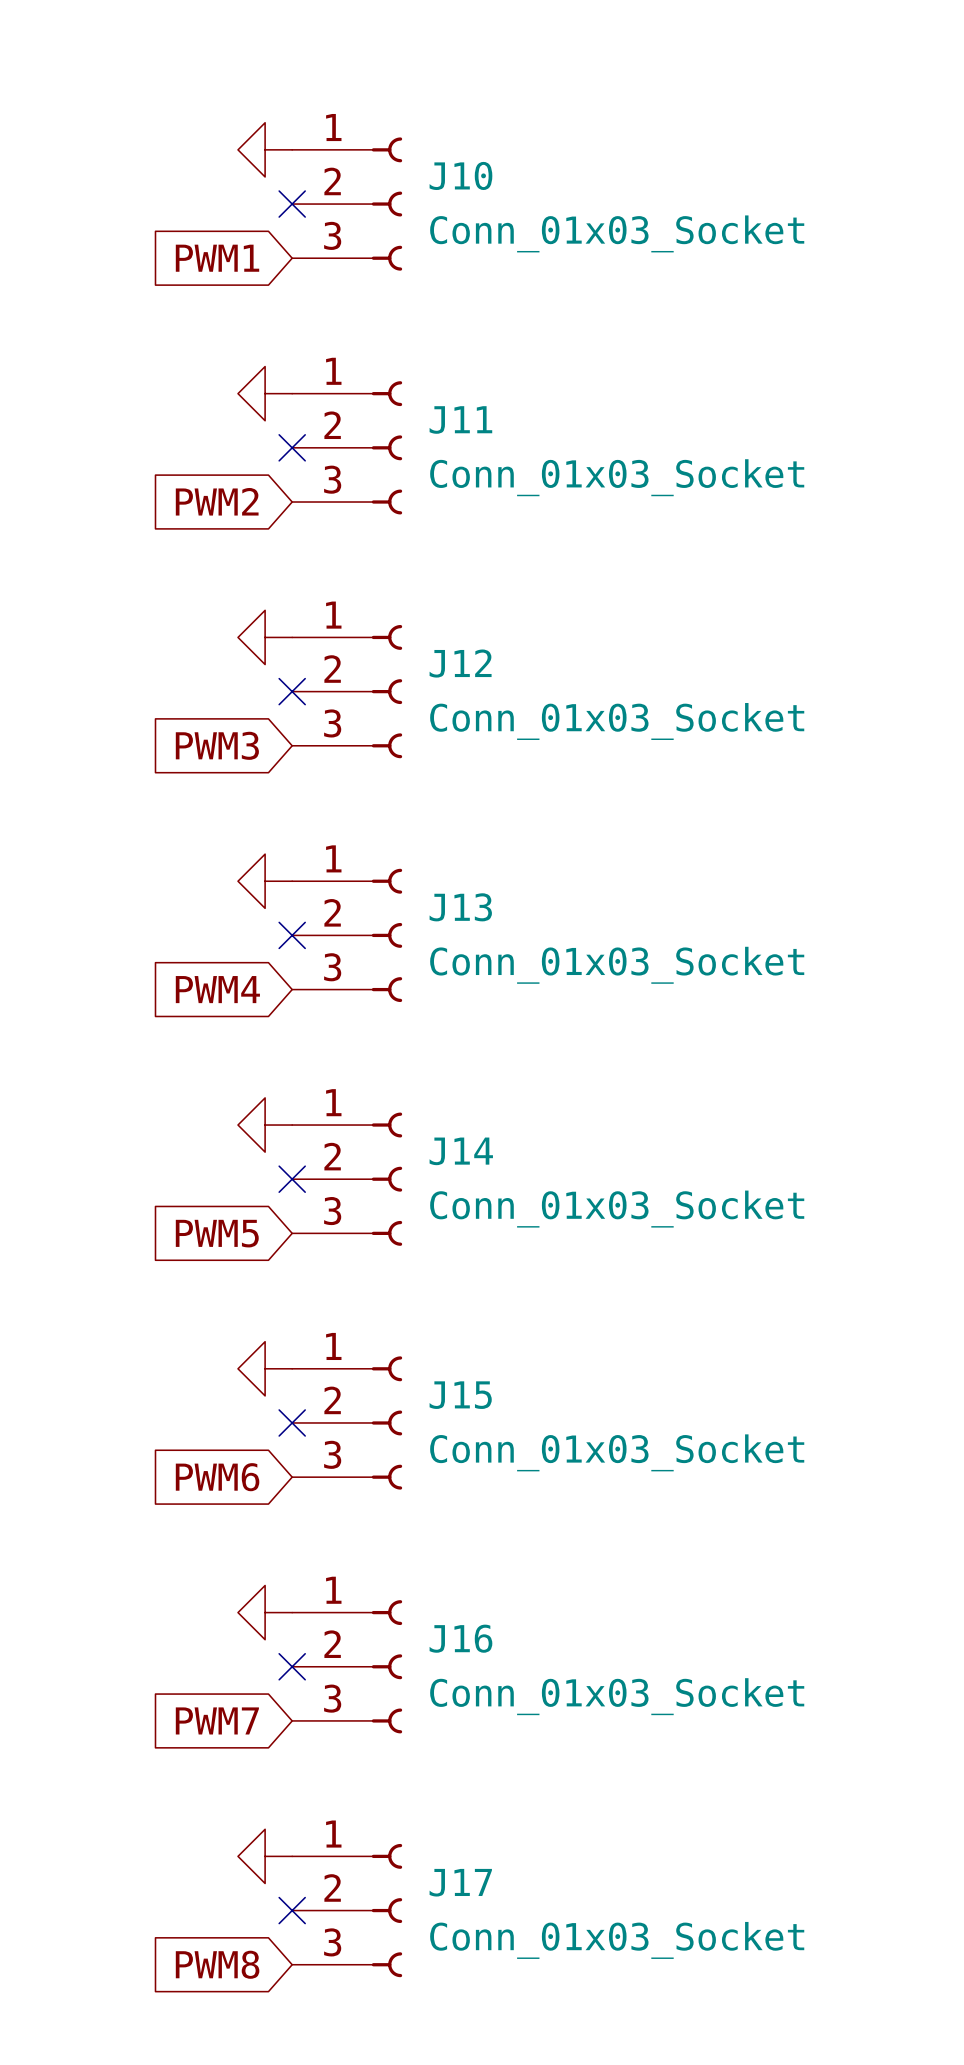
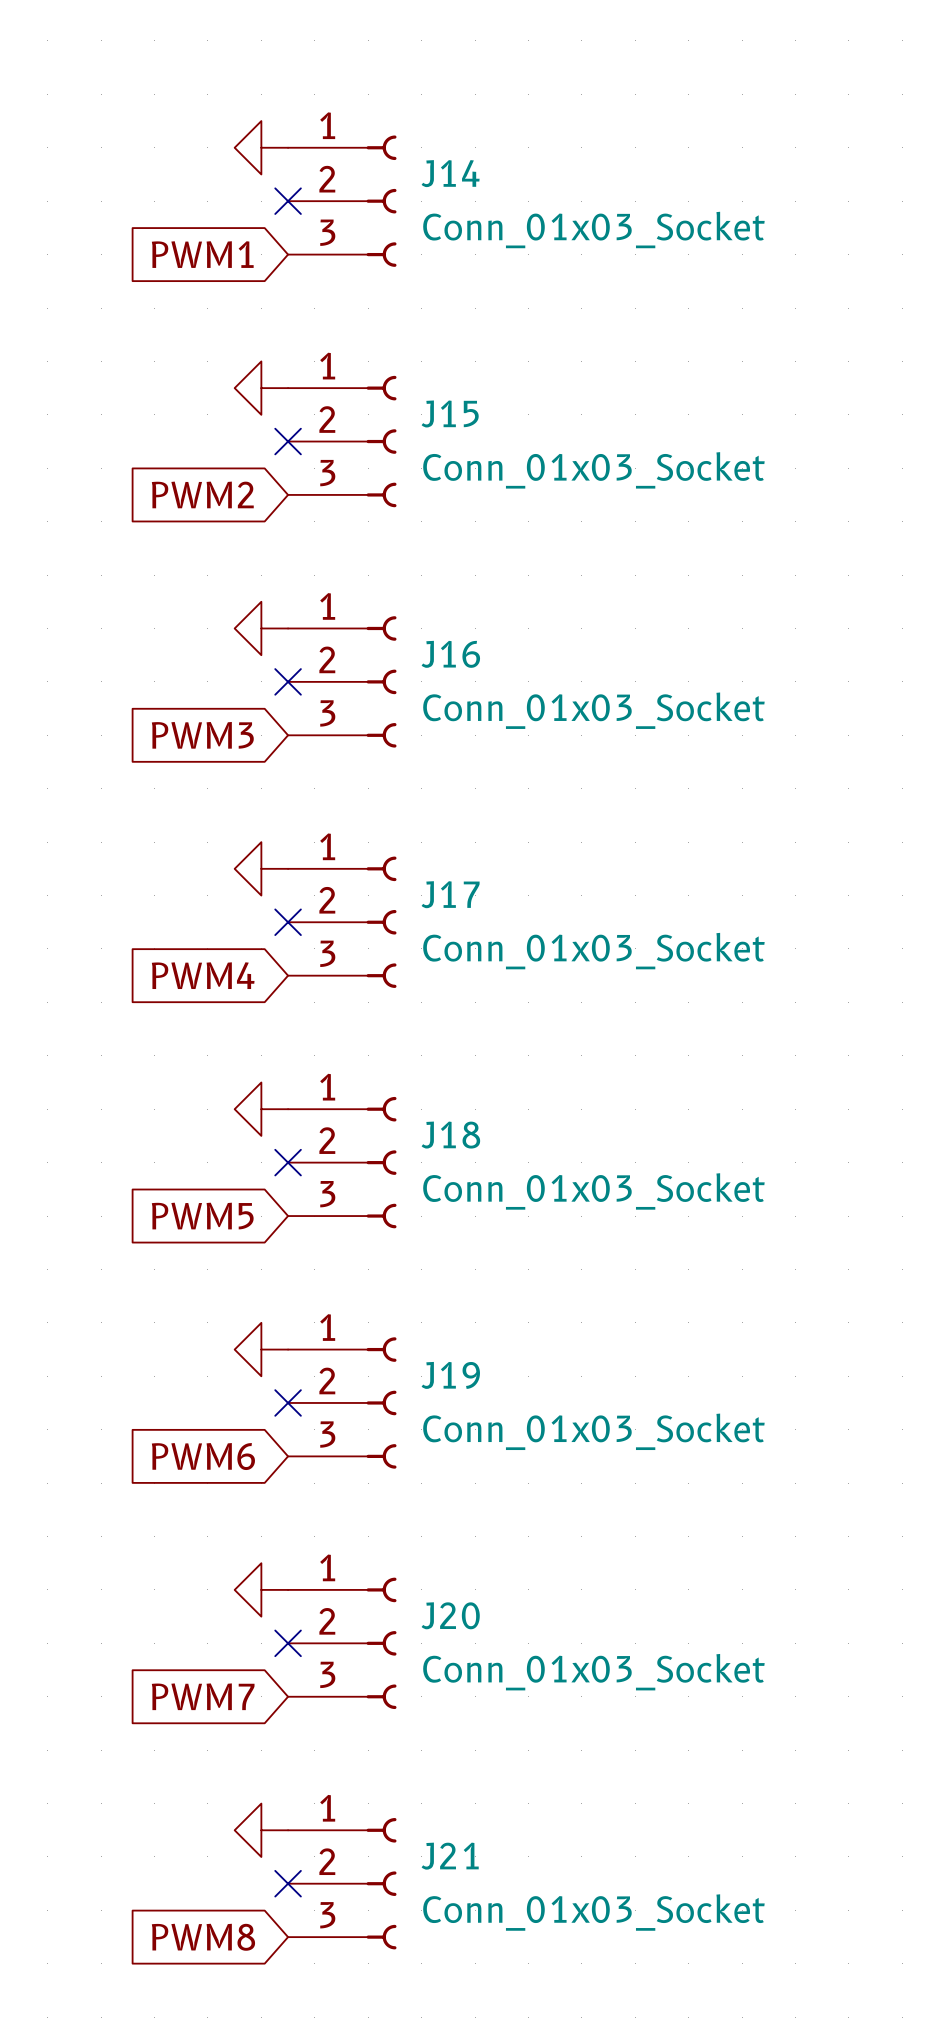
J10 name: J10 (460, 175) -> J14 (450, 173)
J11 name: J11 (460, 419) -> J15 (450, 413)
J12 name: J12 (460, 663) -> J16 (450, 654)
J13 name: J13 (460, 907) -> J17 (450, 894)
J14 name: J14 (461, 1151) -> J18 (450, 1135)
J15 name: J15 (460, 1395) -> J19 (450, 1375)
J16 name: J16 (460, 1638) -> J20 (450, 1615)
J17 name: J17 (460, 1882) -> J21 (450, 1856)

